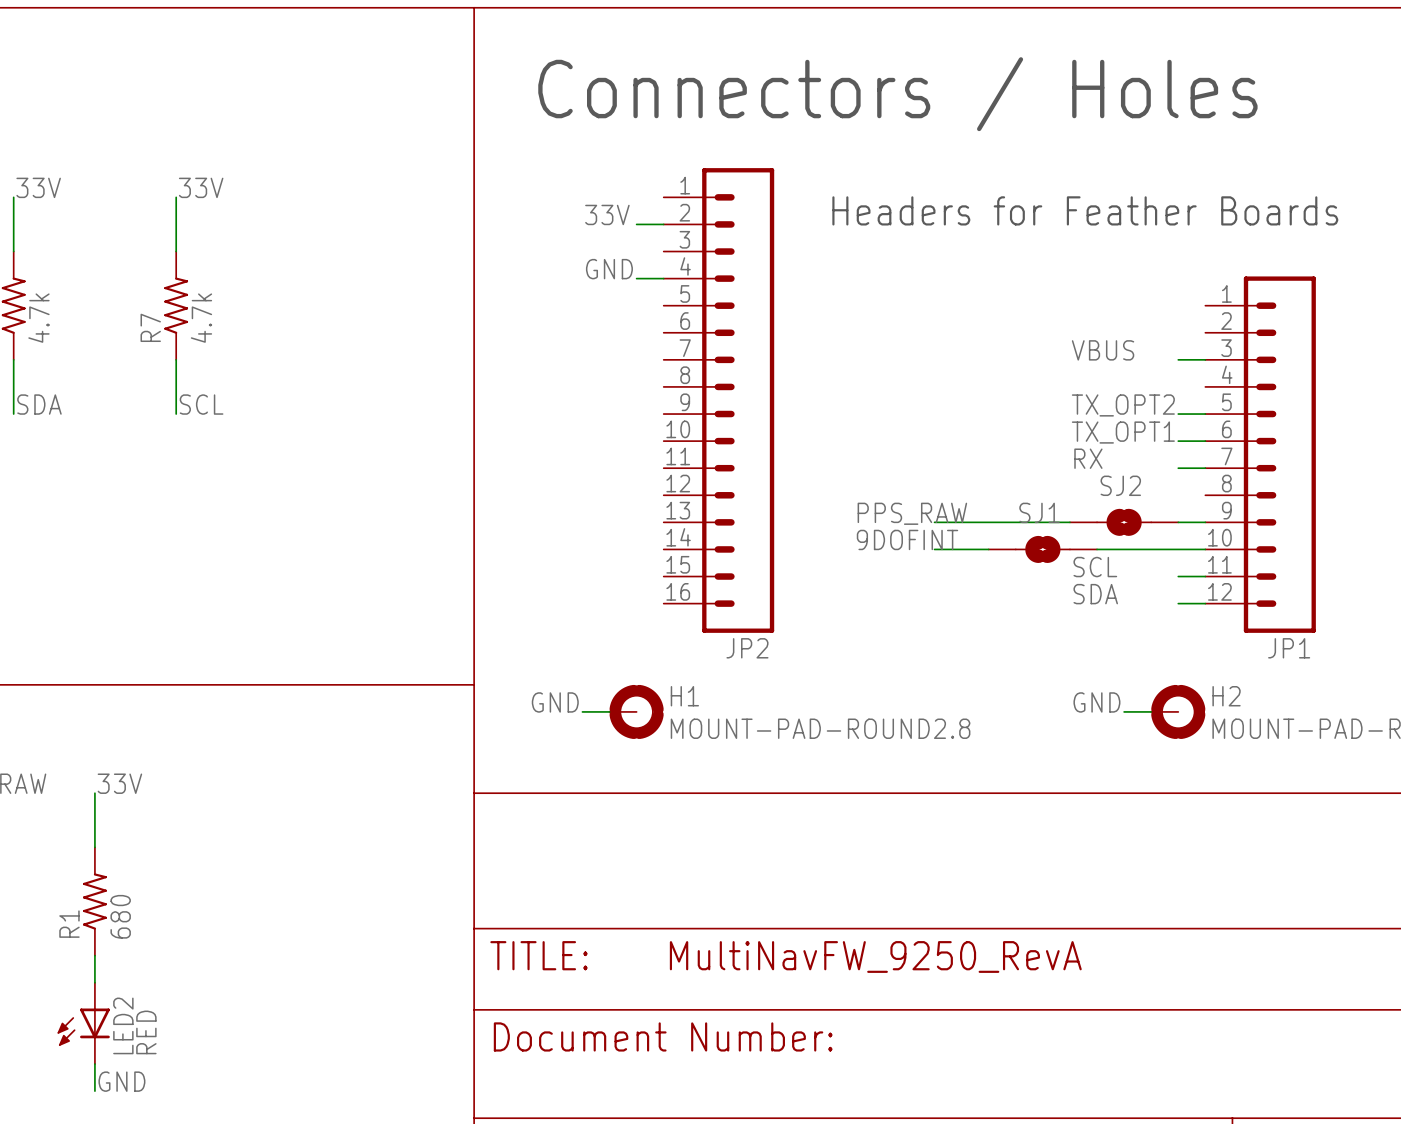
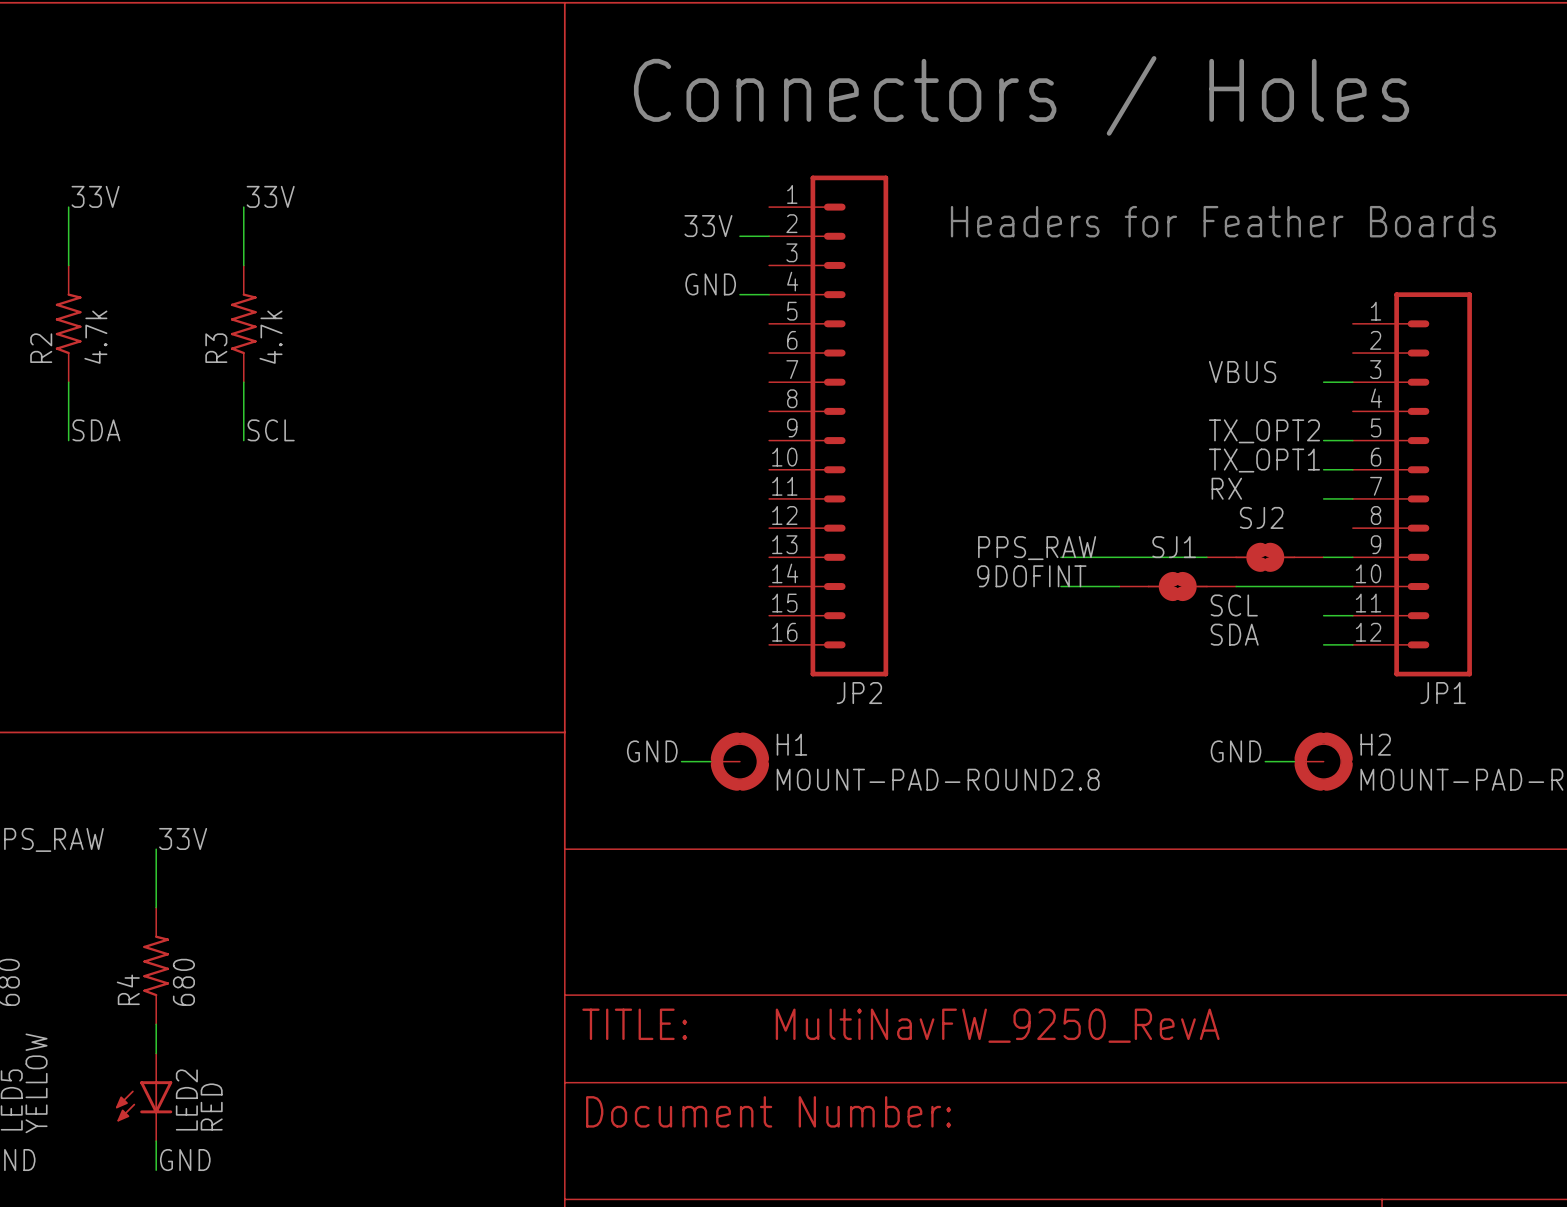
R7 name: R7 (150, 327) -> R3 (216, 348)
R1 name: R1 (69, 924) -> R4 (128, 989)

